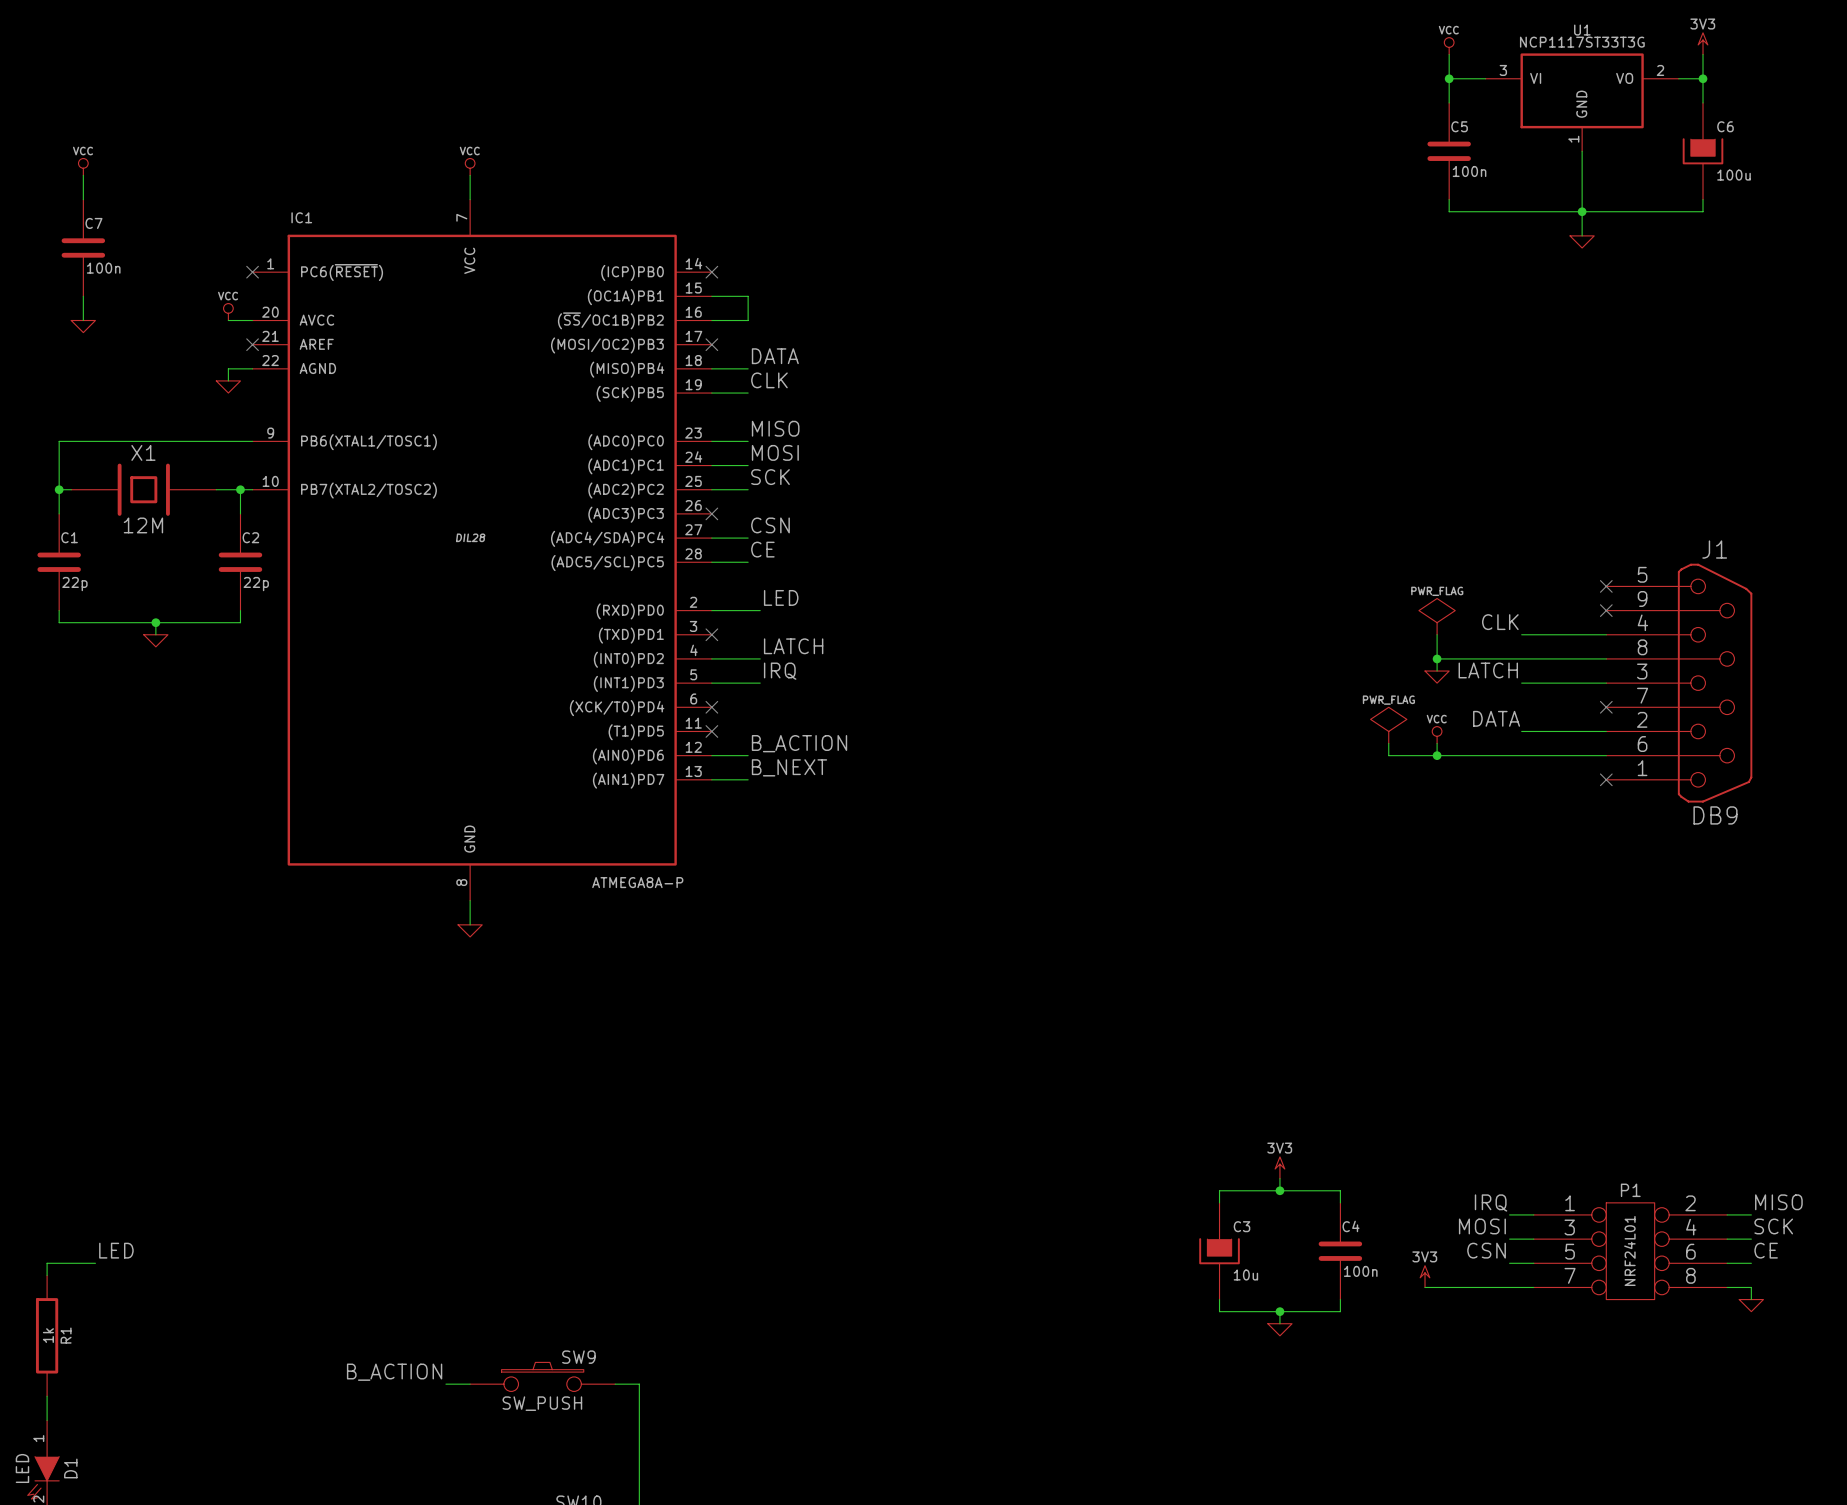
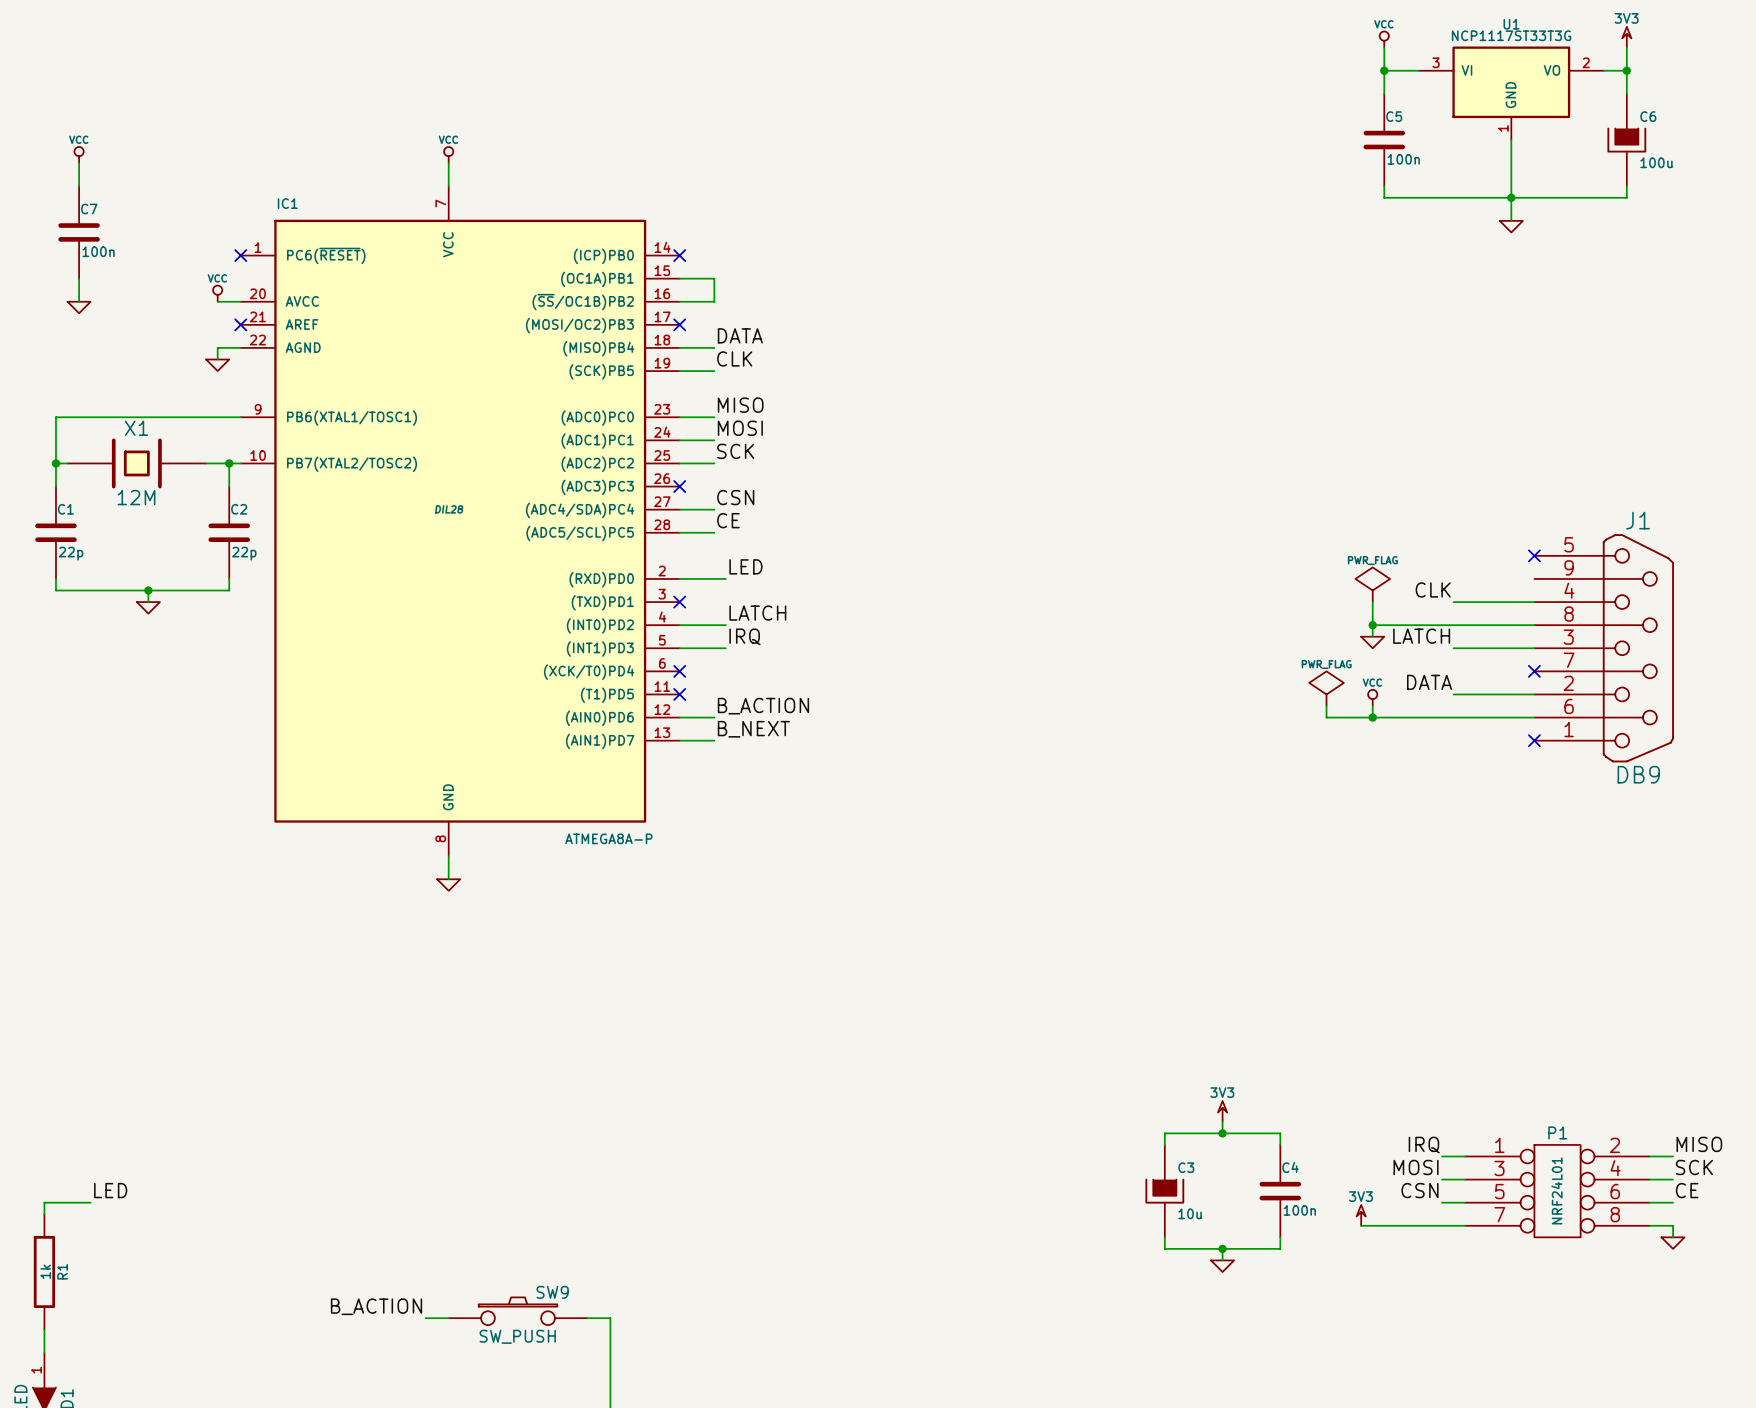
no-connect mark: (1606, 610) -> none

